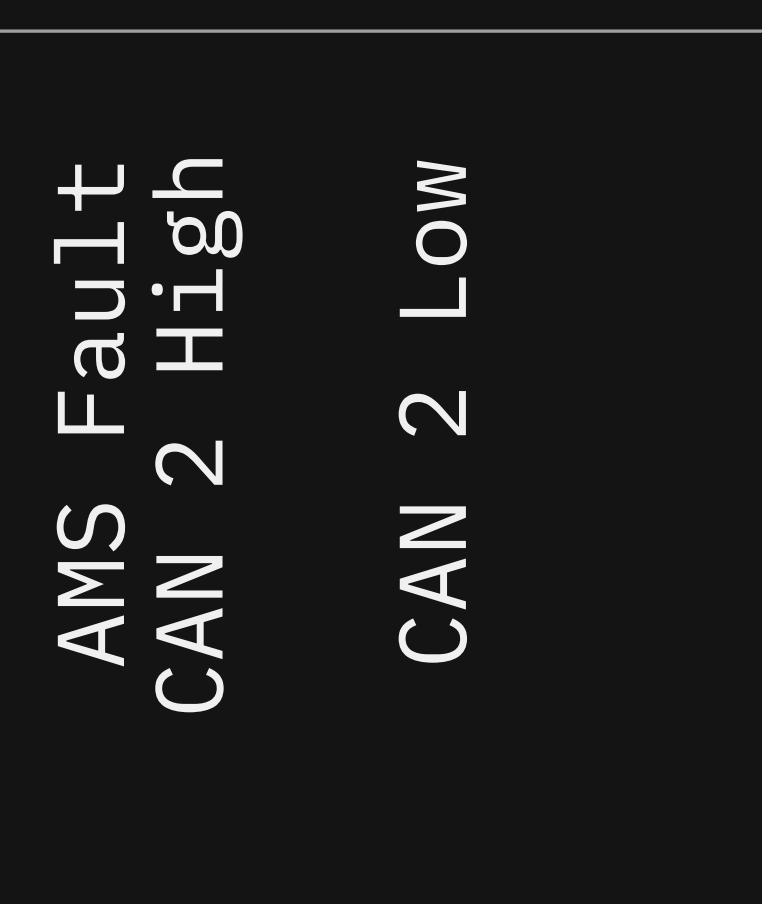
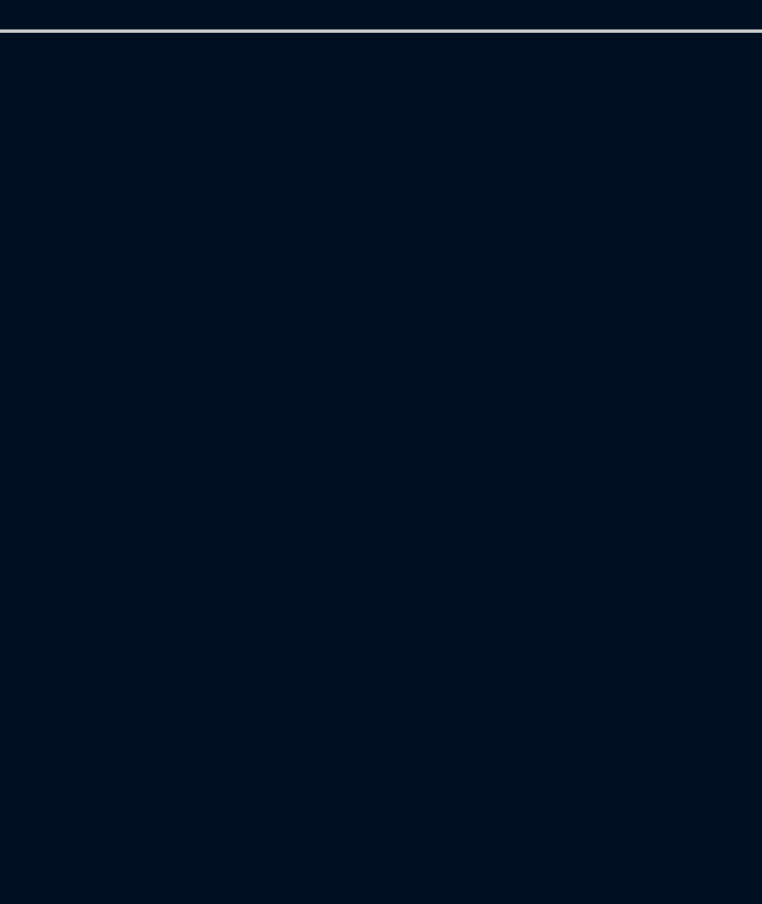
text: CAN 2 Low (432, 411) -> none
text: AMS Fault (89, 415) -> none
text: CAN 2 High (197, 435) -> none

